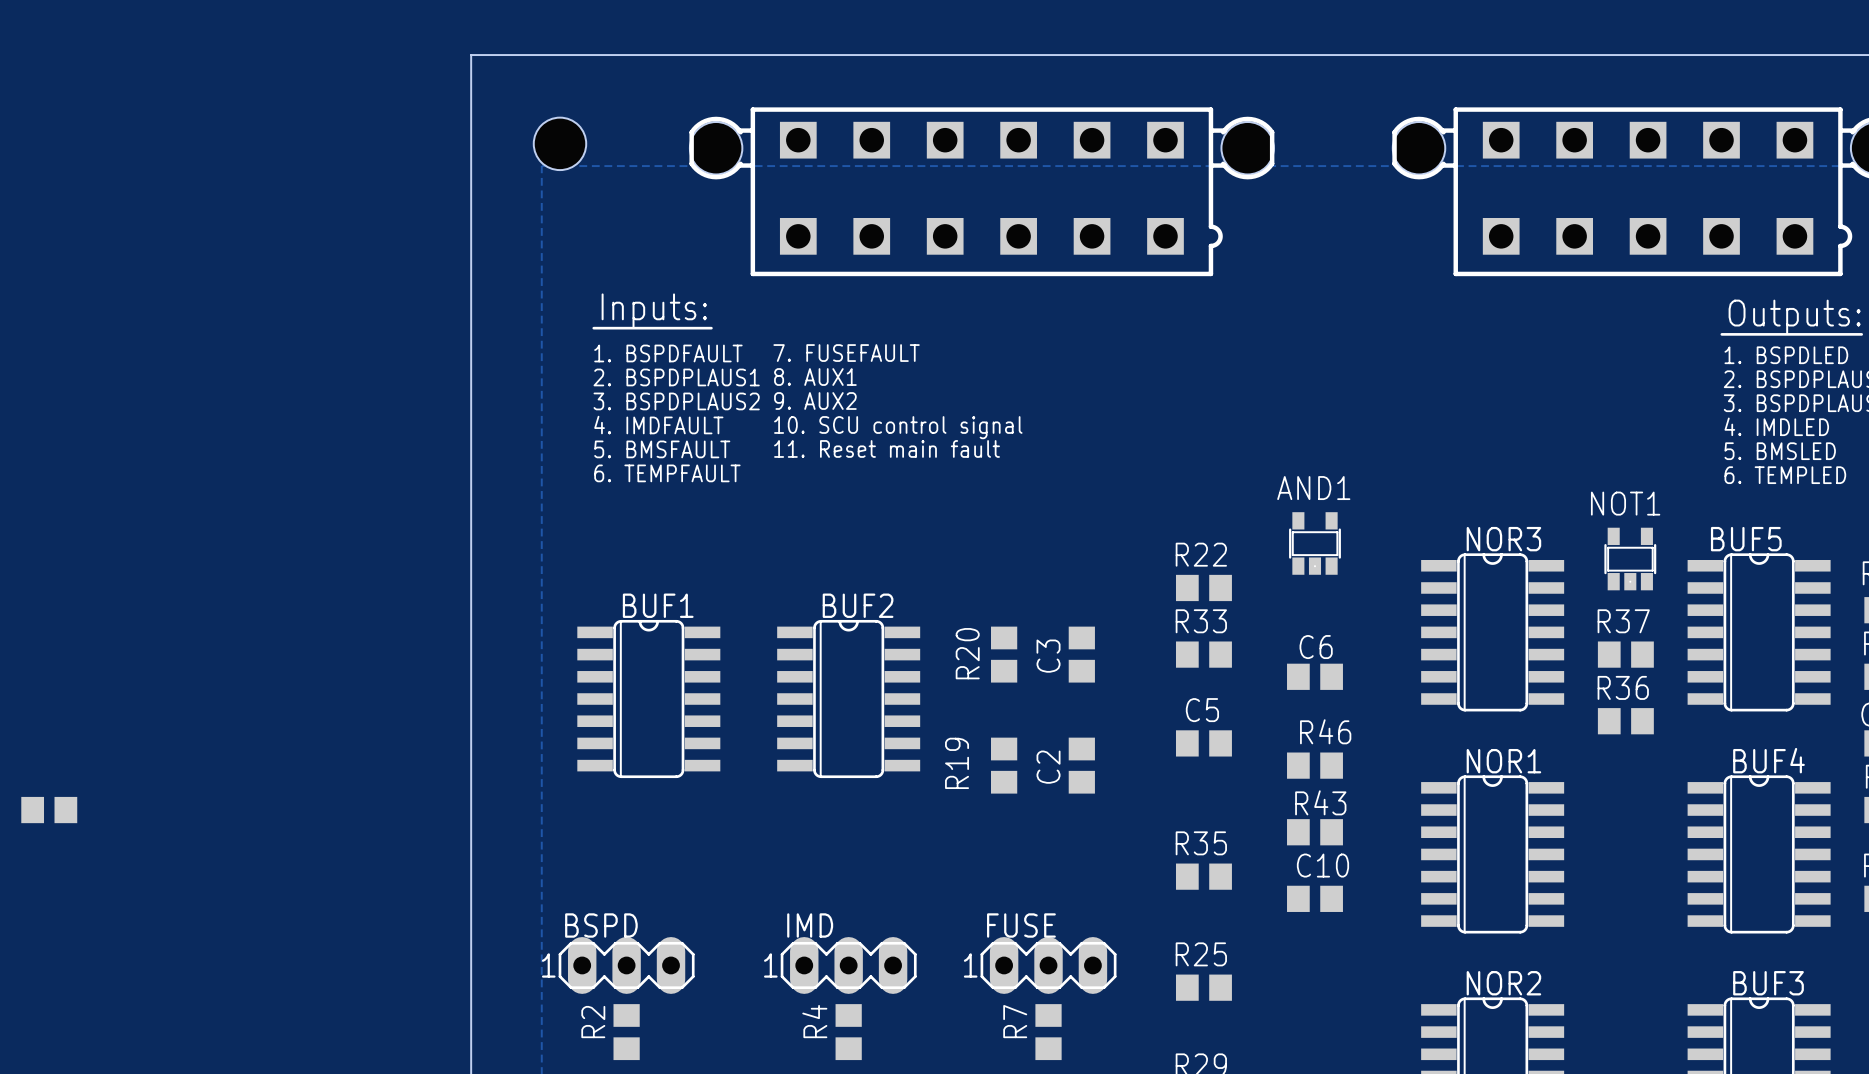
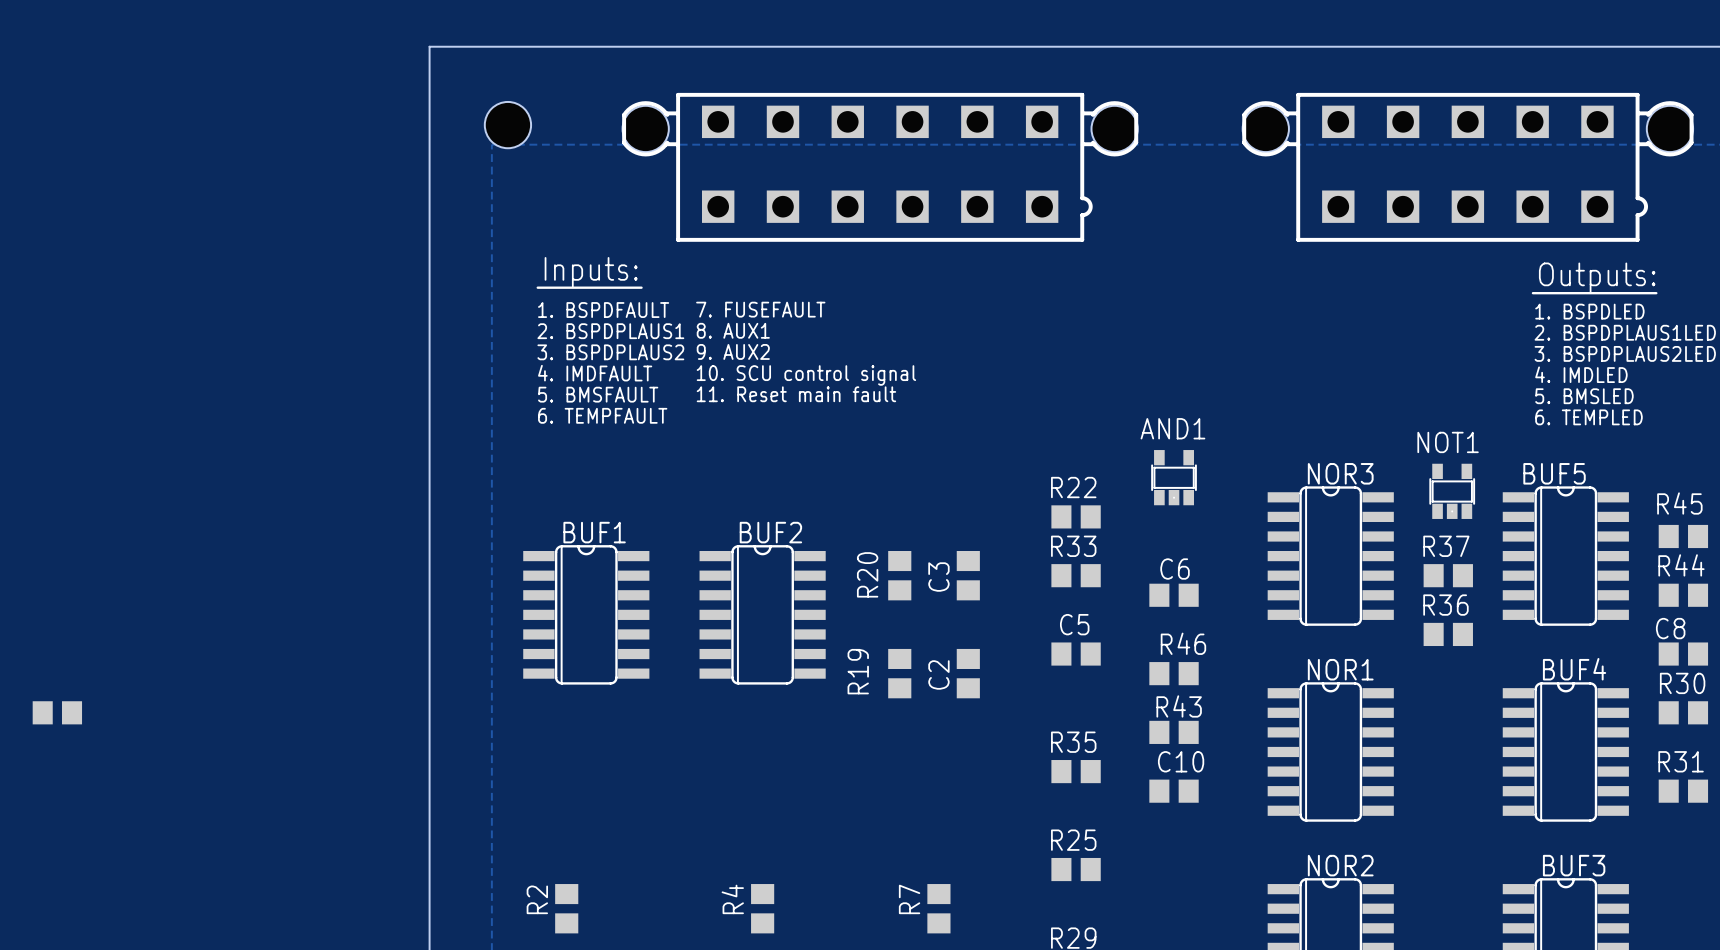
BSPD: (626, 965) -> none
IMD: (848, 965) -> none
FUSE: (1048, 965) -> none

